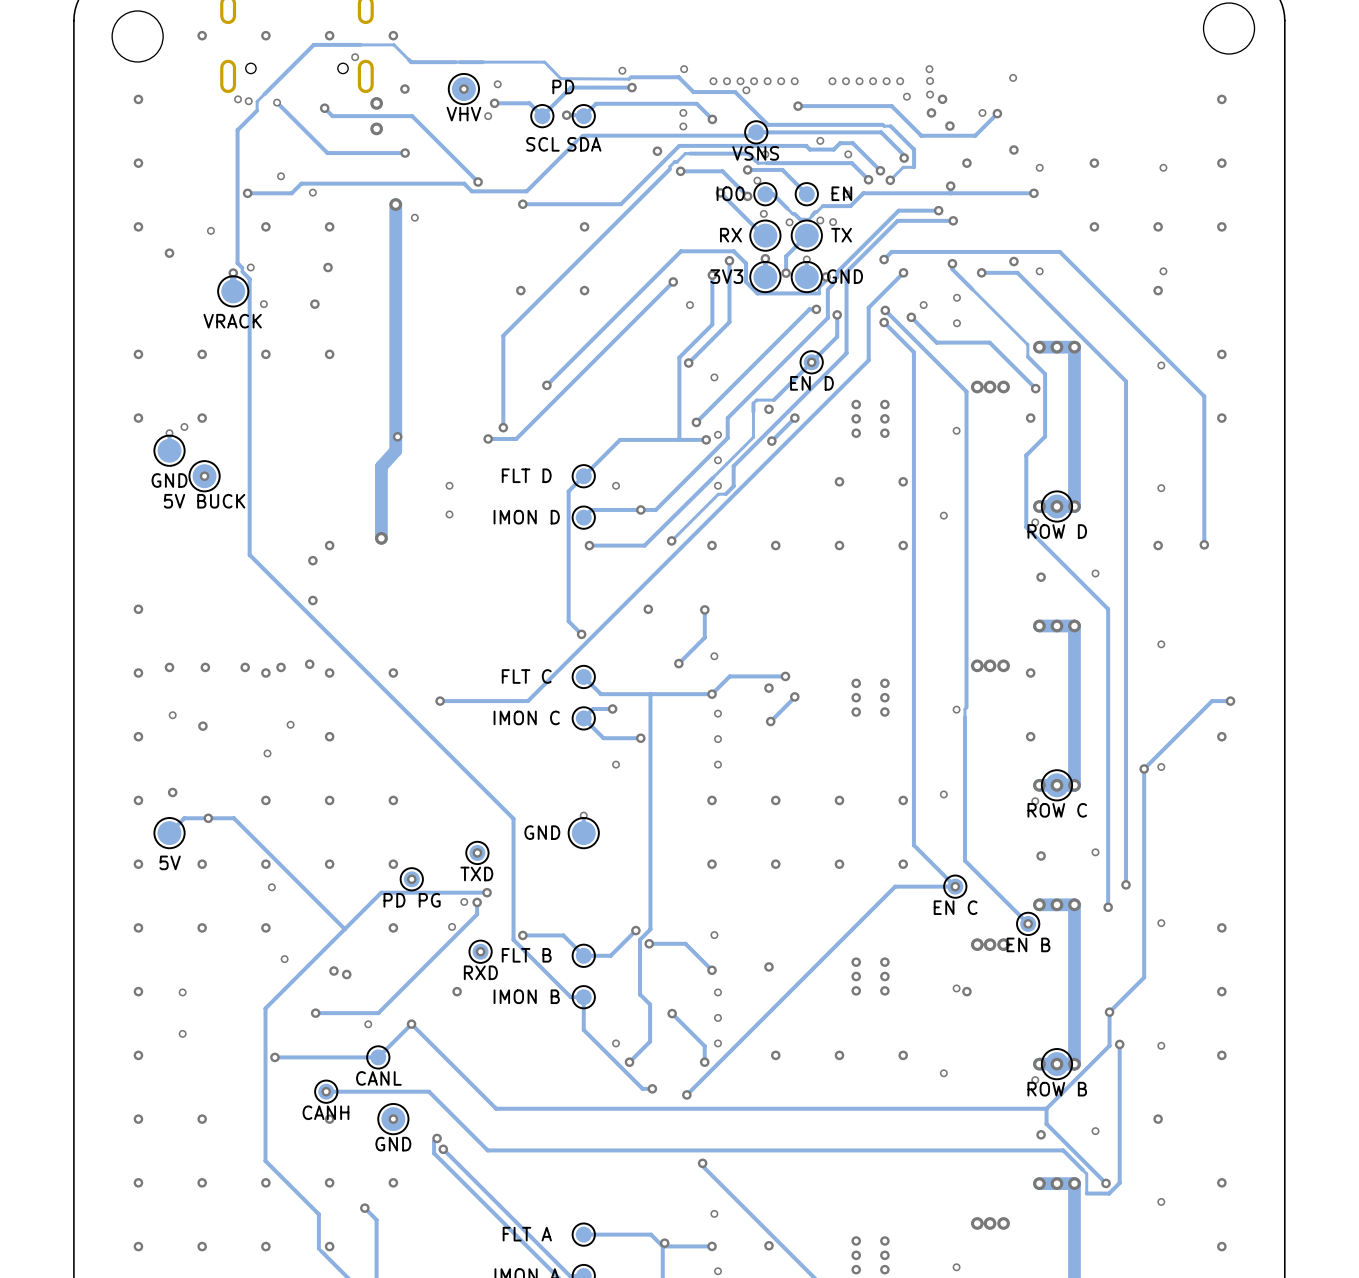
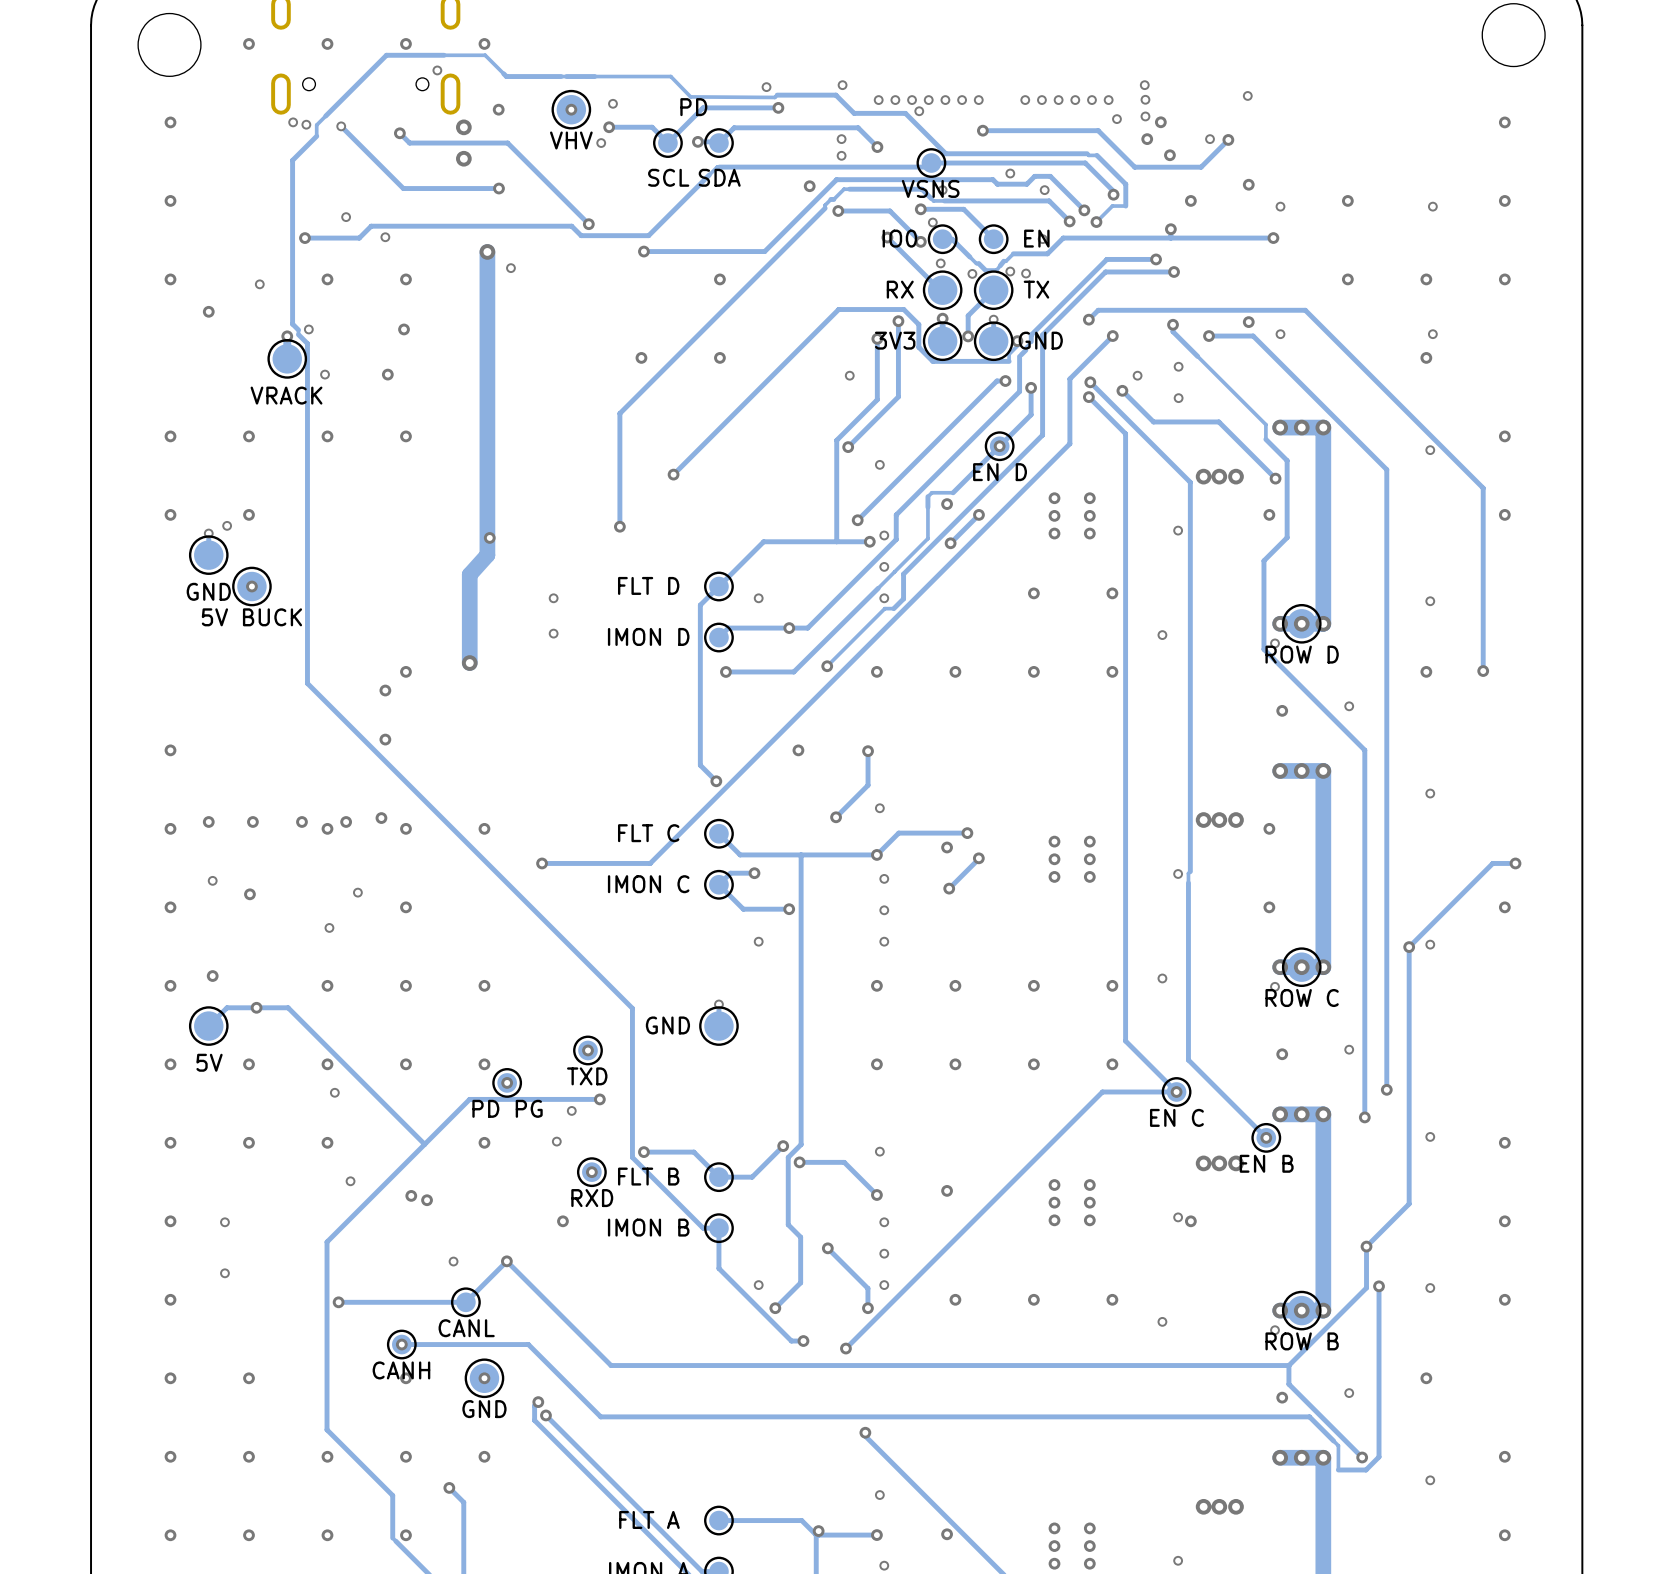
track: (673, 281) (516, 438) (488, 438) -> none
via: (673, 281) -> none
via: (488, 438) -> none
track: (477, 902) (477, 914) (378, 1013) (315, 1013) -> none
via: (477, 902) -> none
via: (315, 1013) -> none

